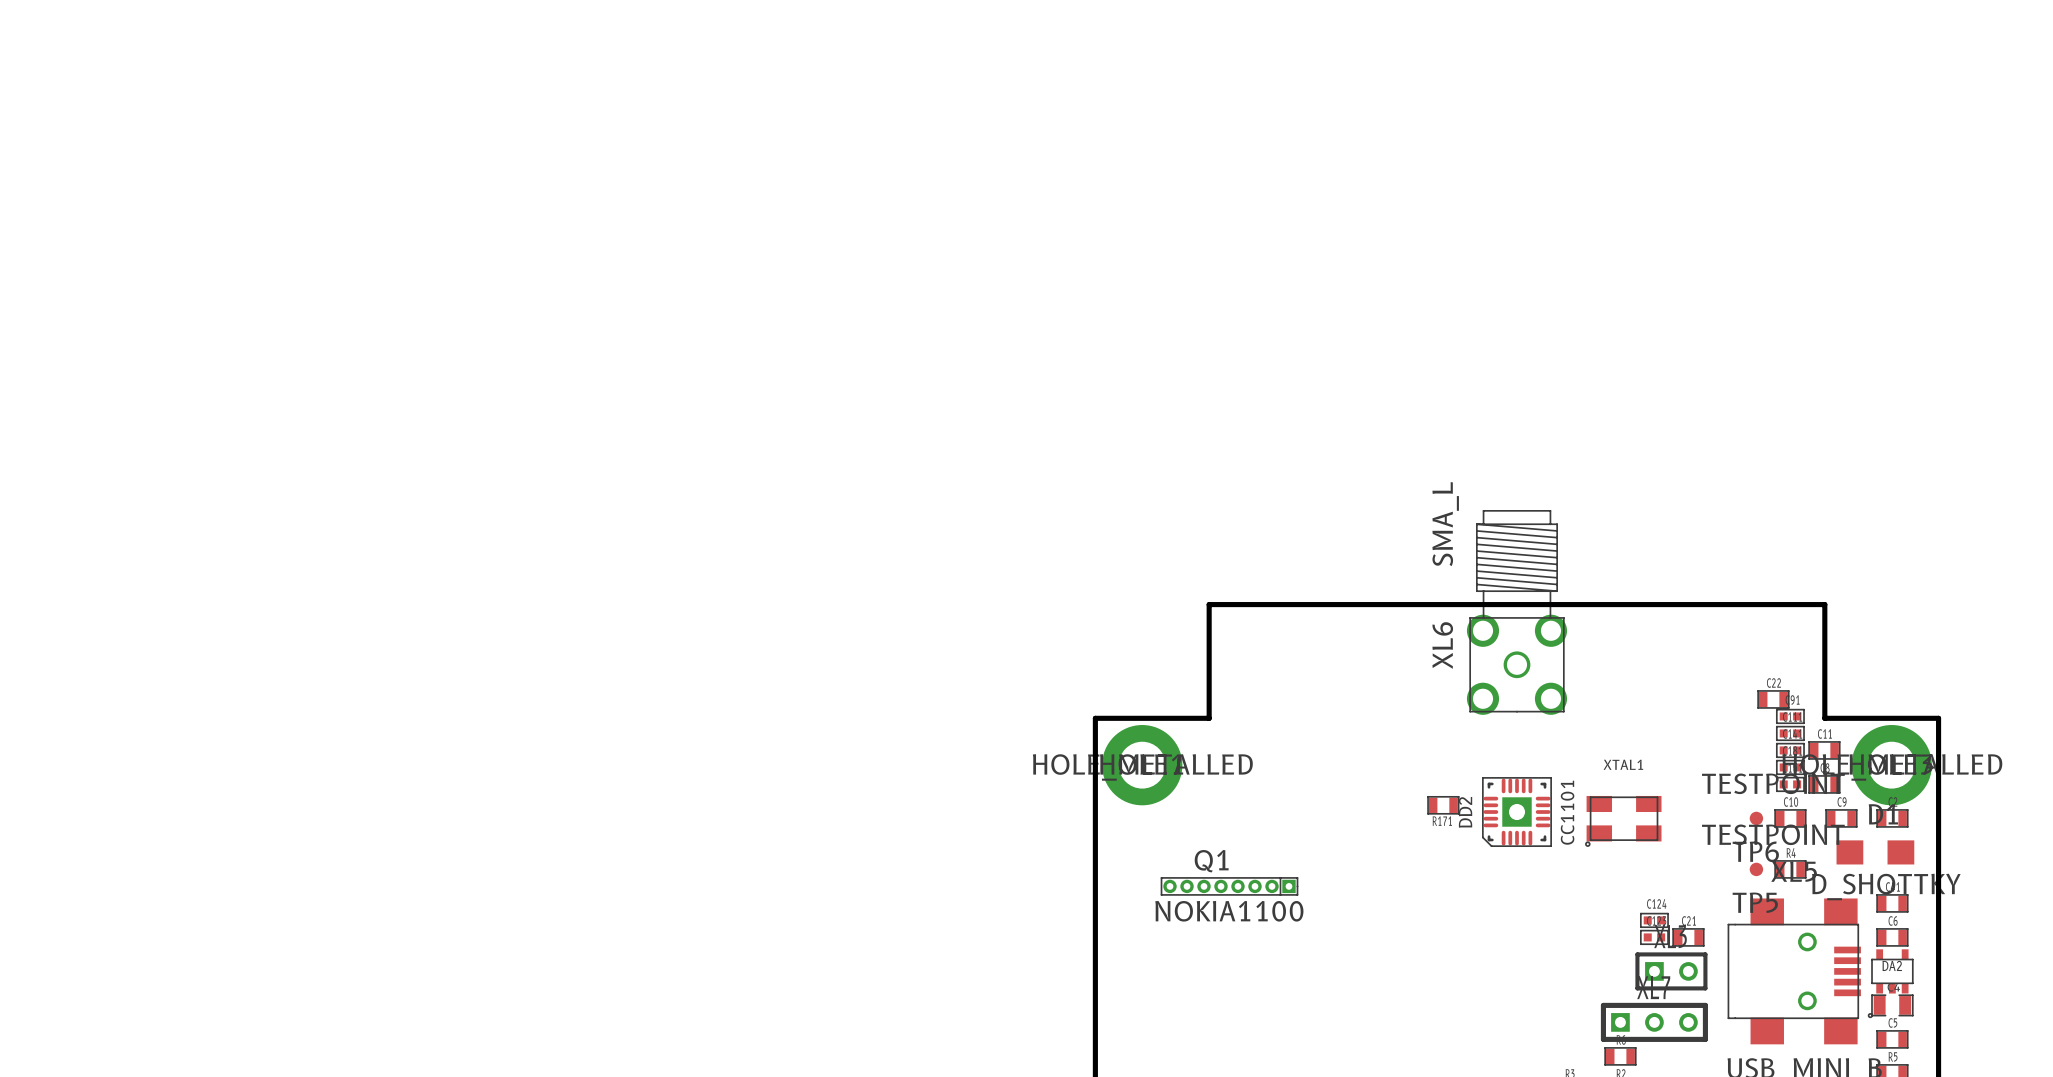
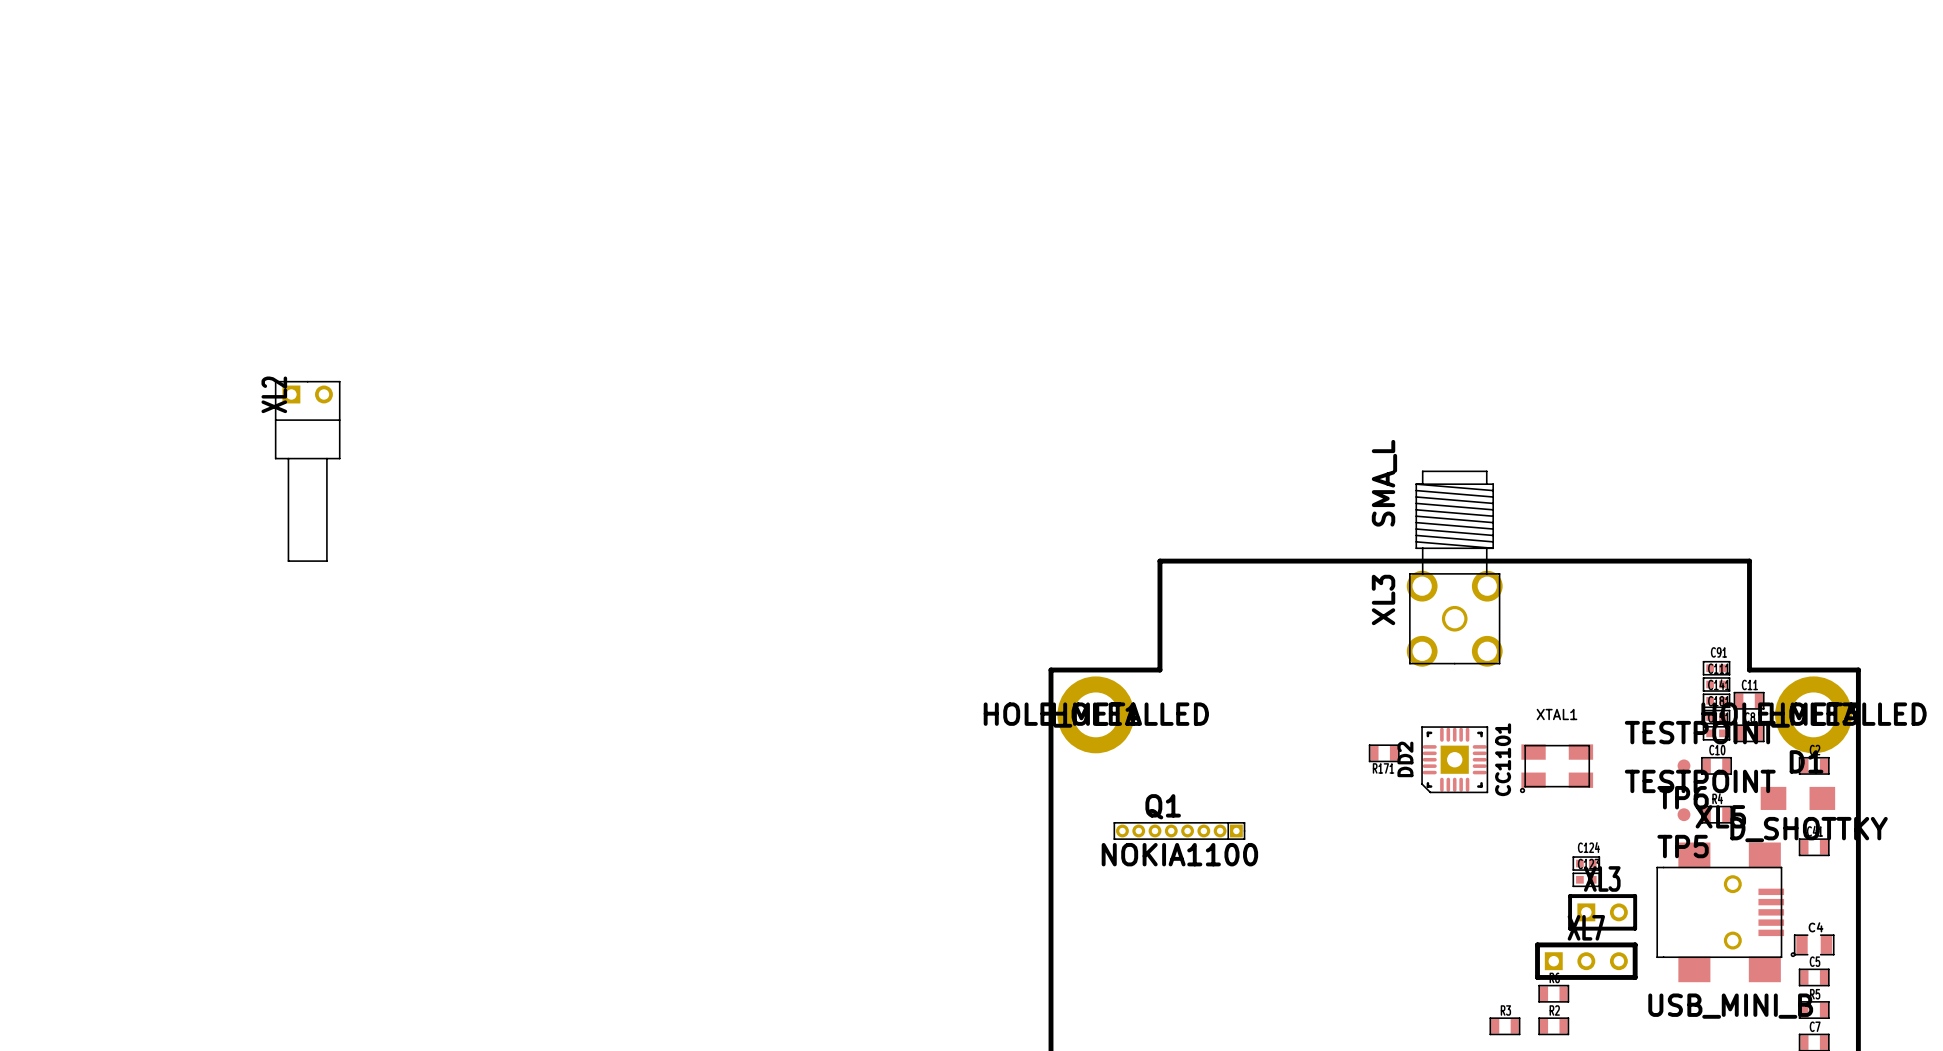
XL2: none -> (307, 471)
XL6 name: XL6 (1442, 645) -> XL3 (1383, 599)
C22: (1773, 699) -> none
C9: (1841, 818) -> none
C21: (1688, 937) -> none
C6: (1892, 937) -> none
DA2: (1892, 971) -> none

